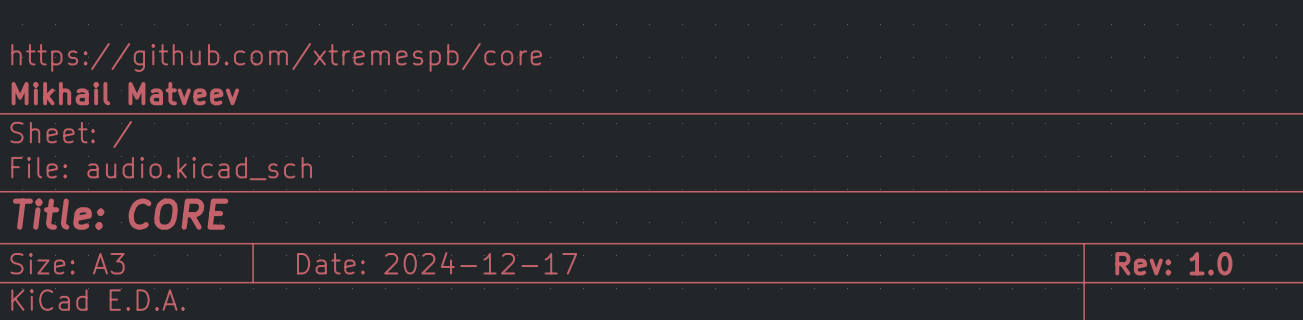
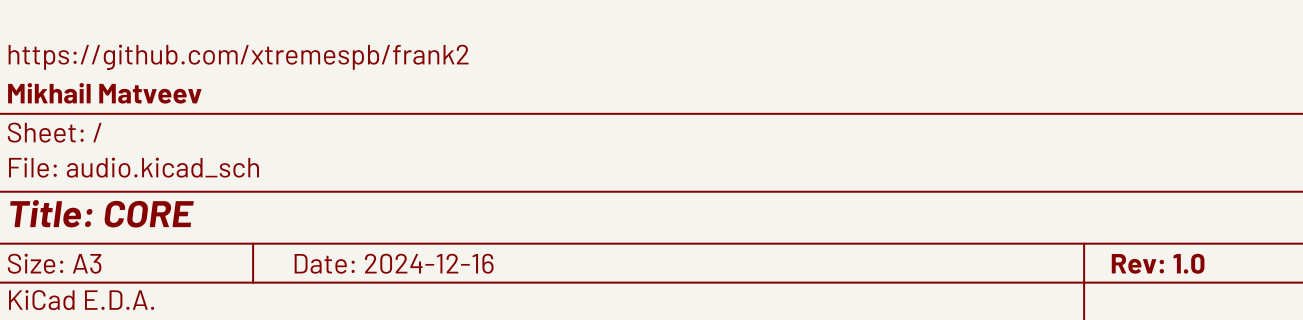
title block: https://github.com/xtremespb/core (276, 57) -> https://github.com/xtremespb/frank2 (238, 57)
title block: Date: 2024-12-17 (437, 263) -> Date: 2024-12-16 (394, 263)

